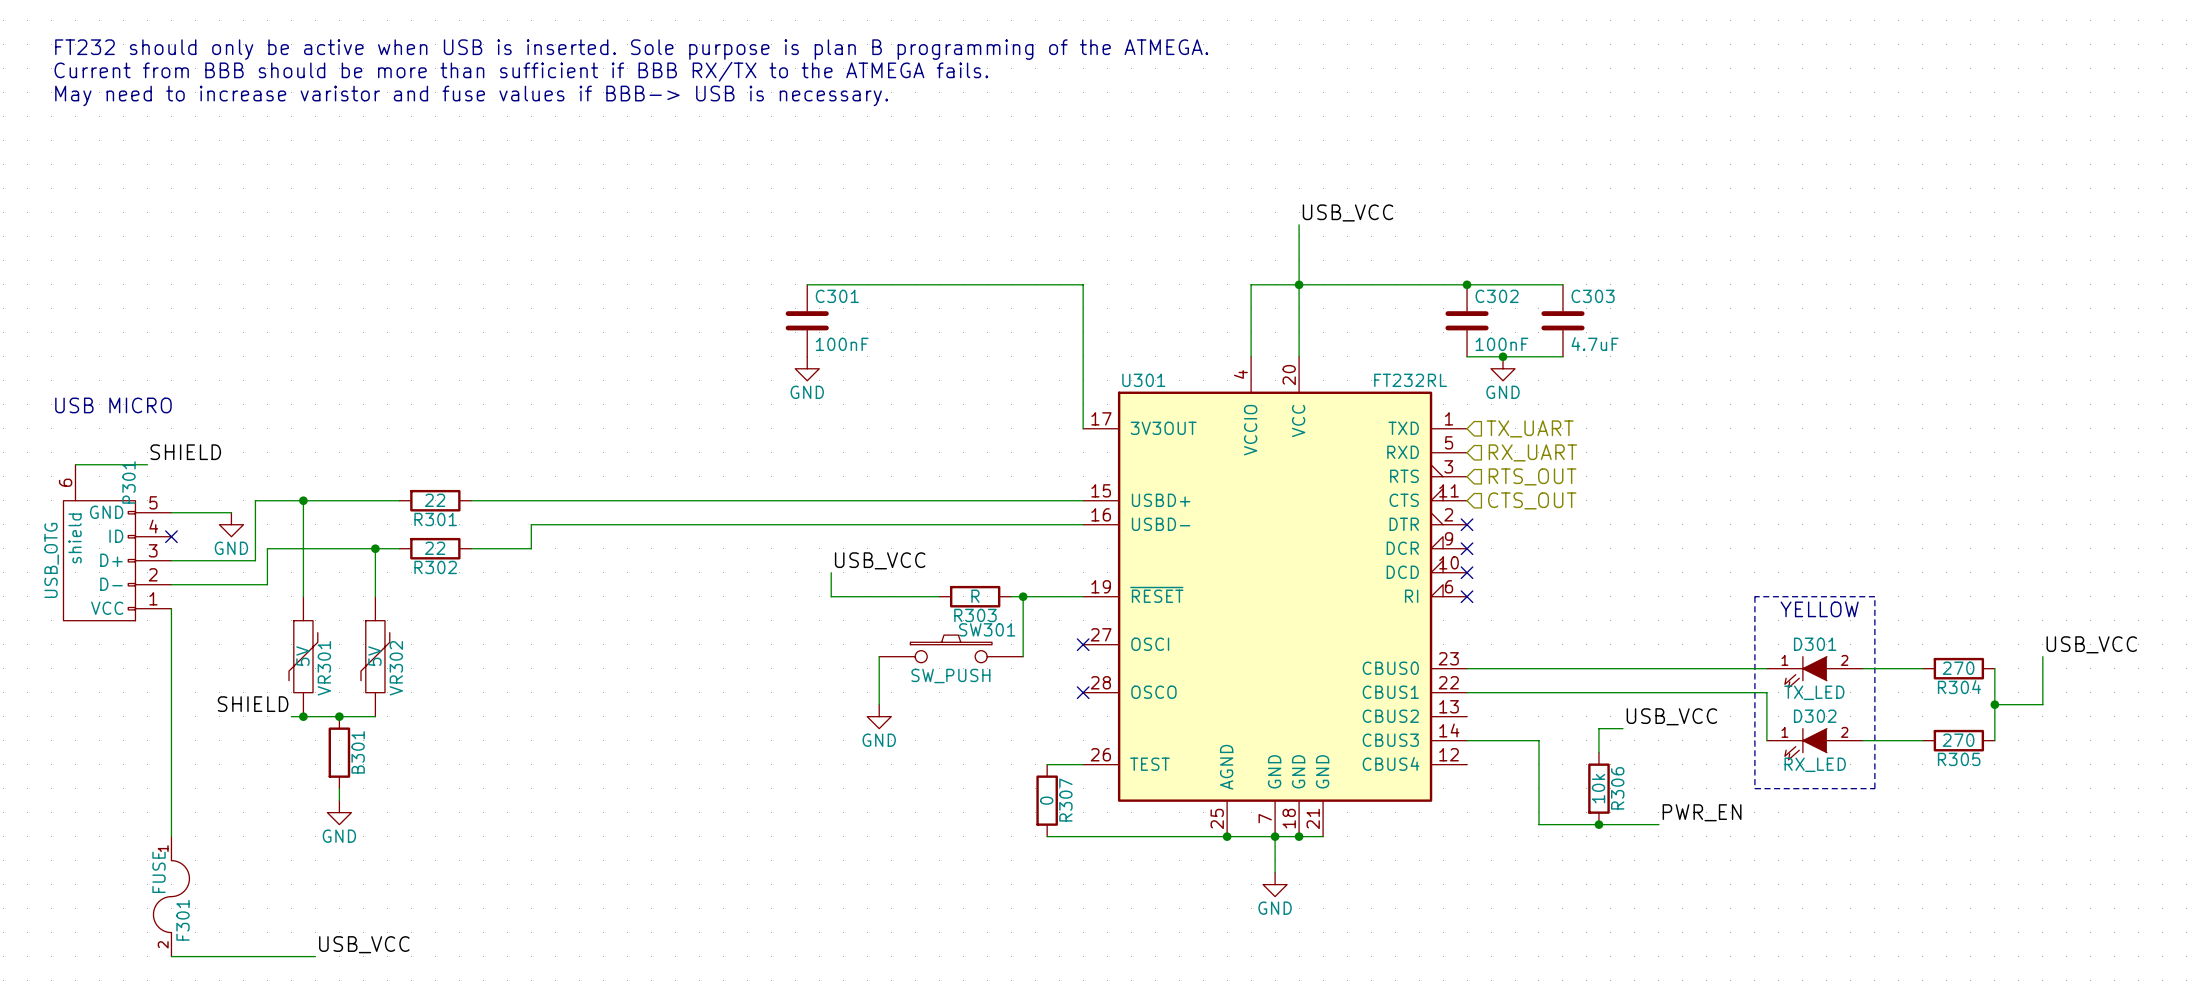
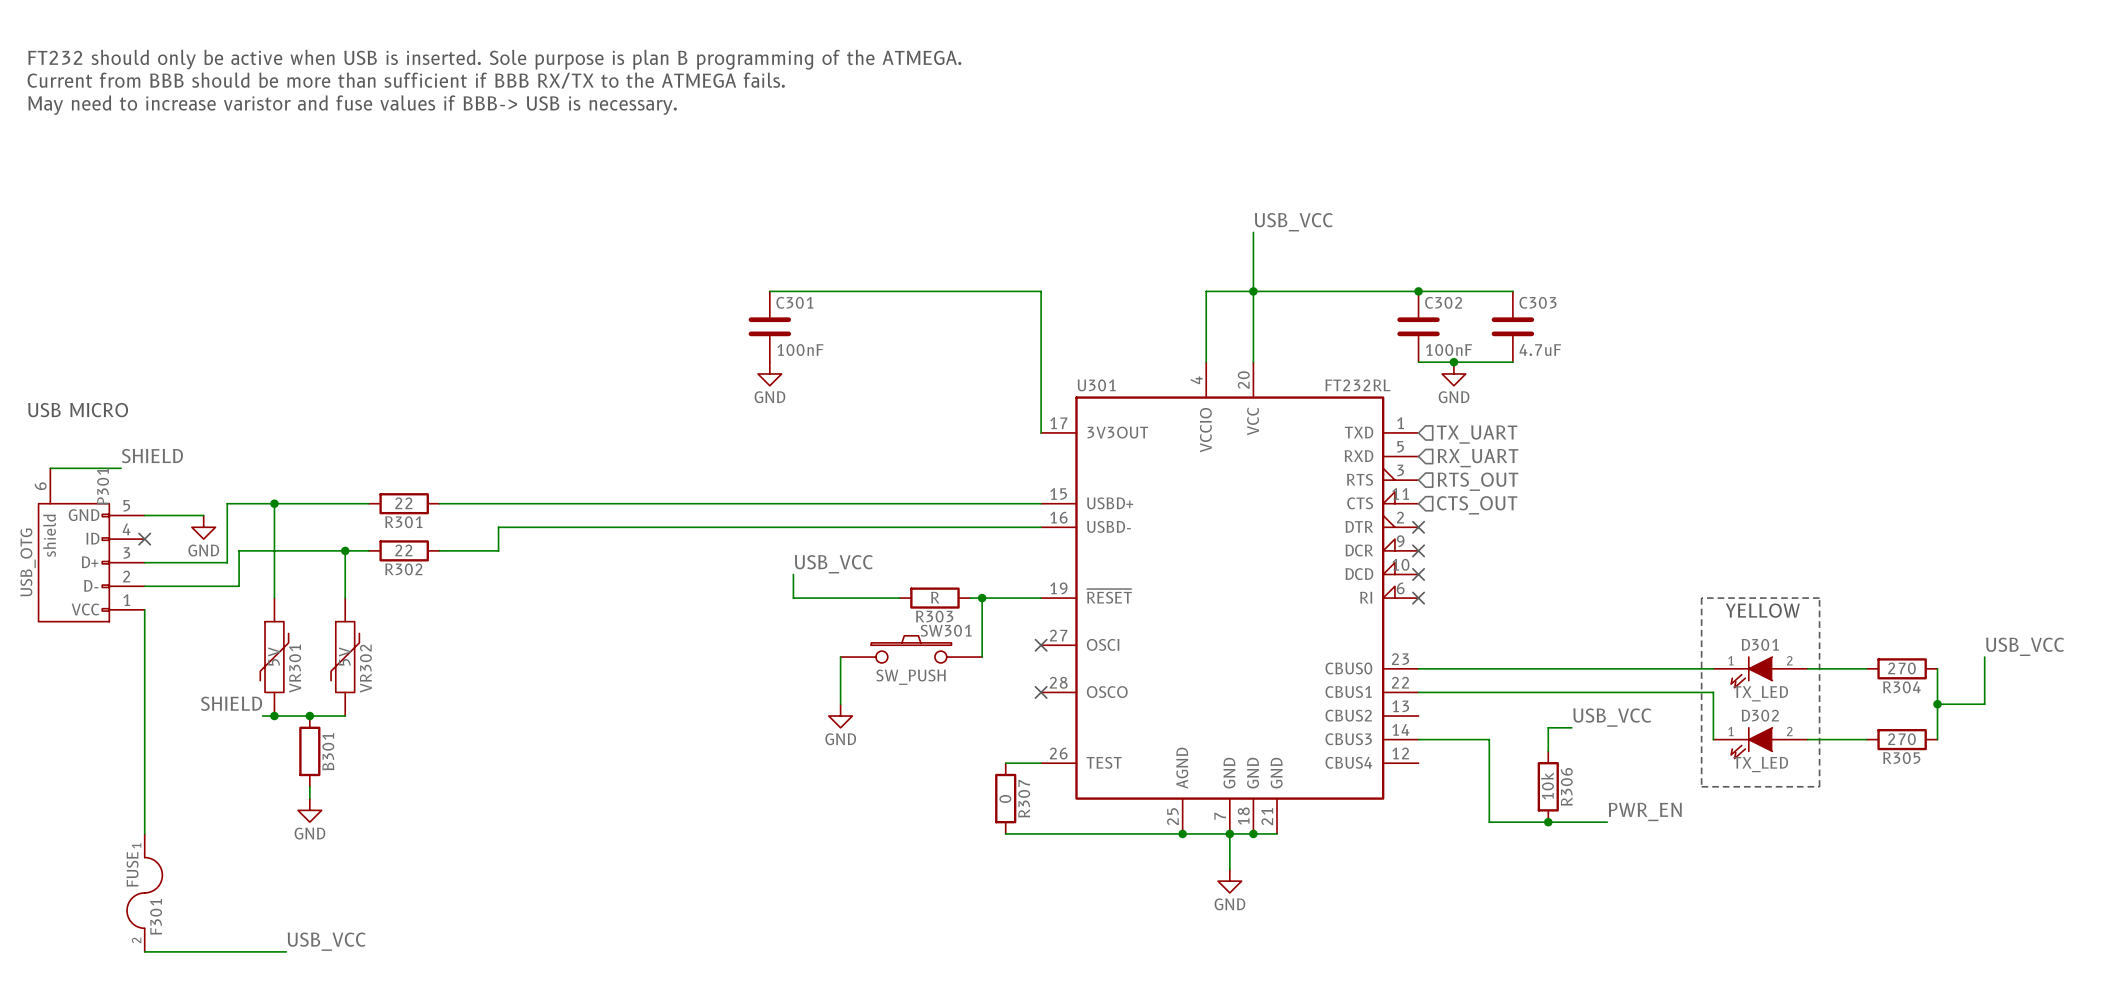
D302 value: RX_LED (1815, 764) -> TX_LED (1760, 764)

